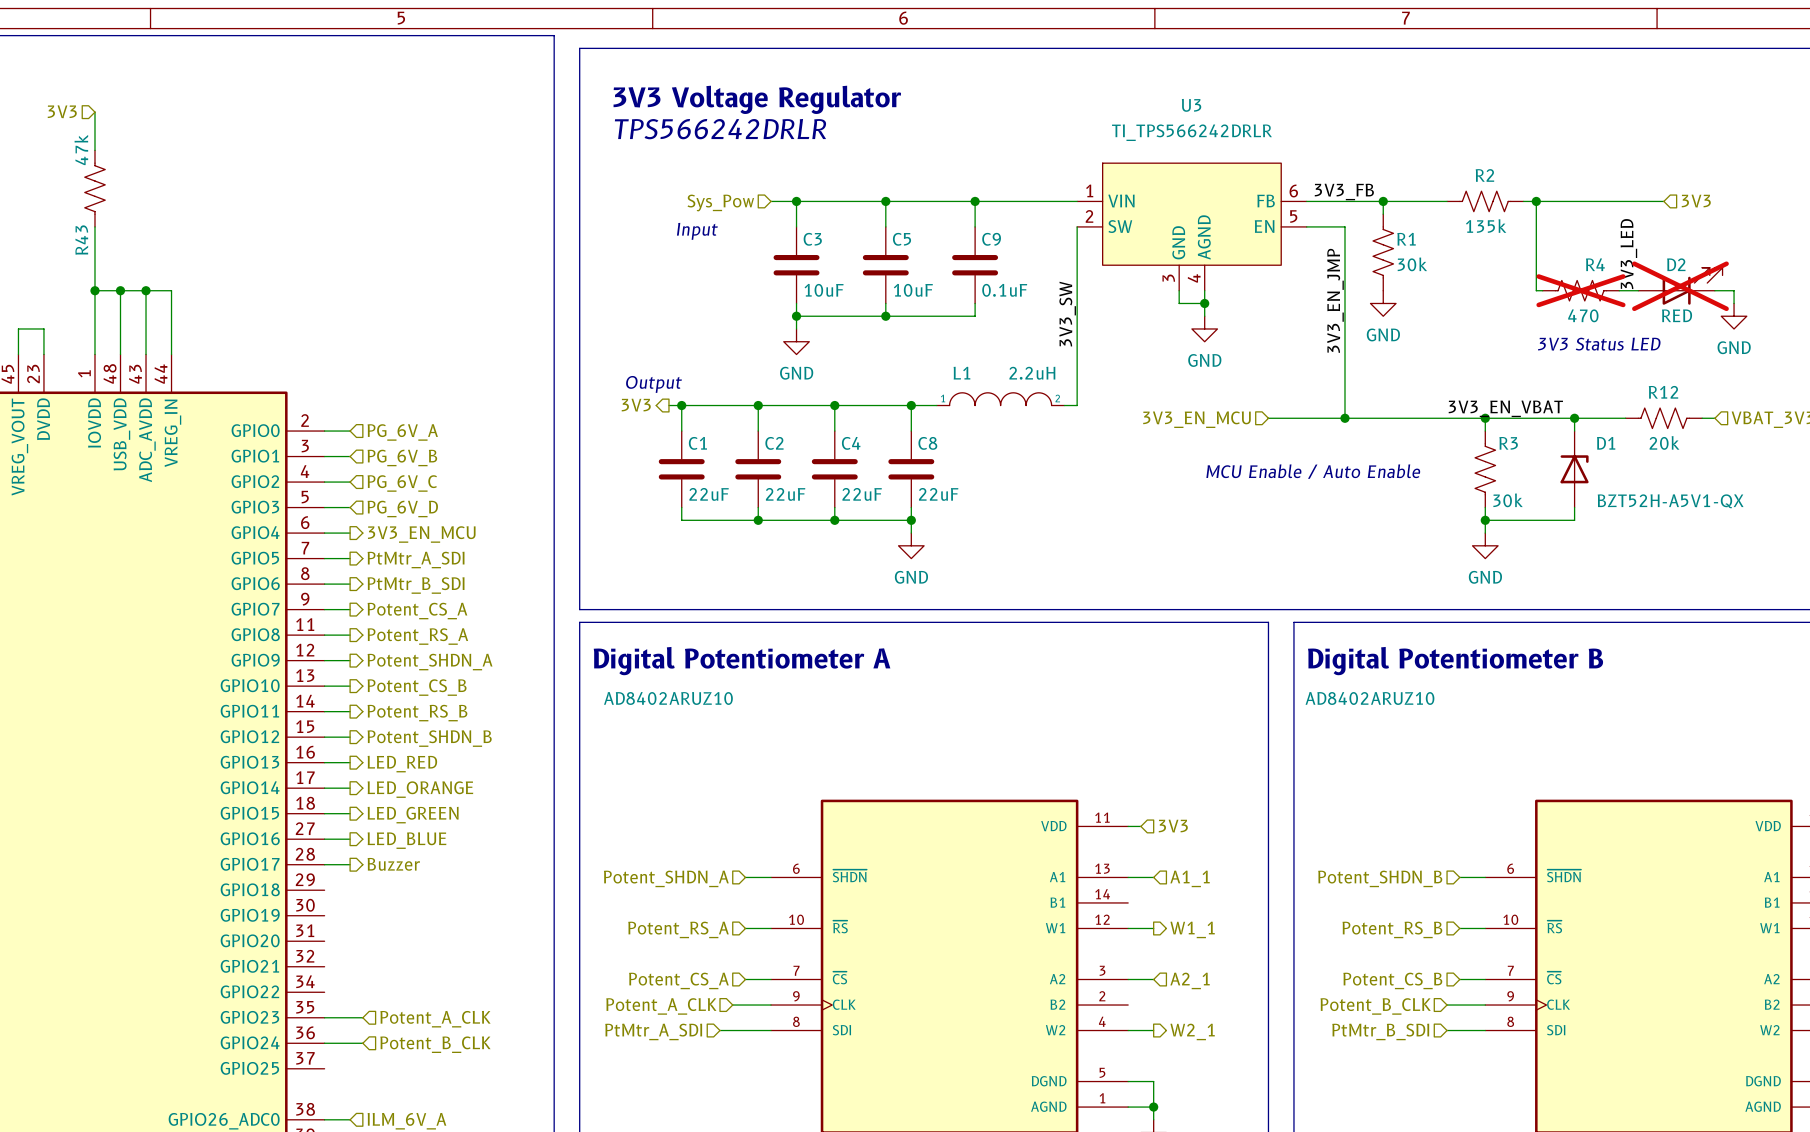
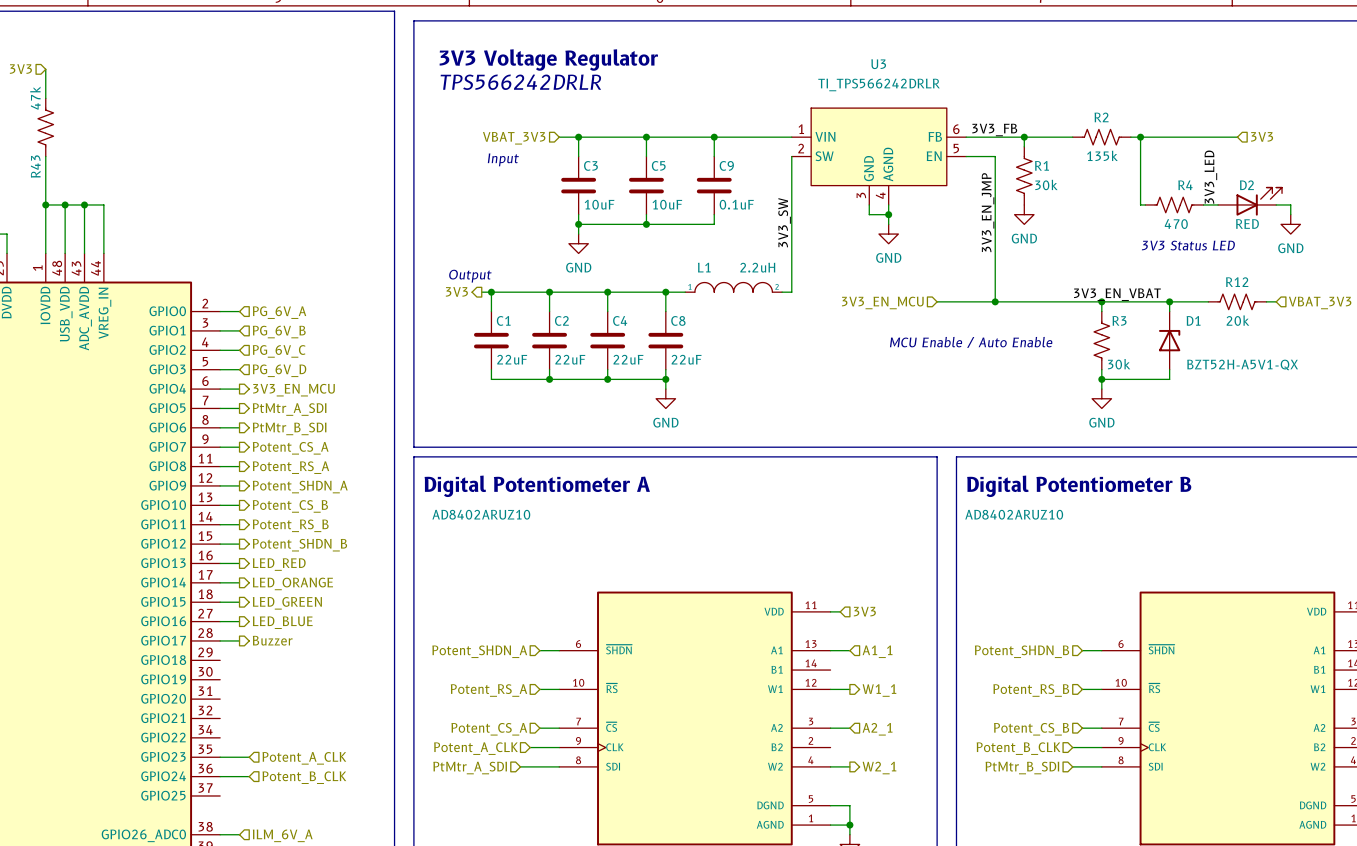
hierarchical label: Sys_Pow (720, 202) -> VBAT_3V3 (514, 138)
D2 do-not-place cross: (1680, 286) -> none
R4 do-not-place cross: (1580, 290) -> none

